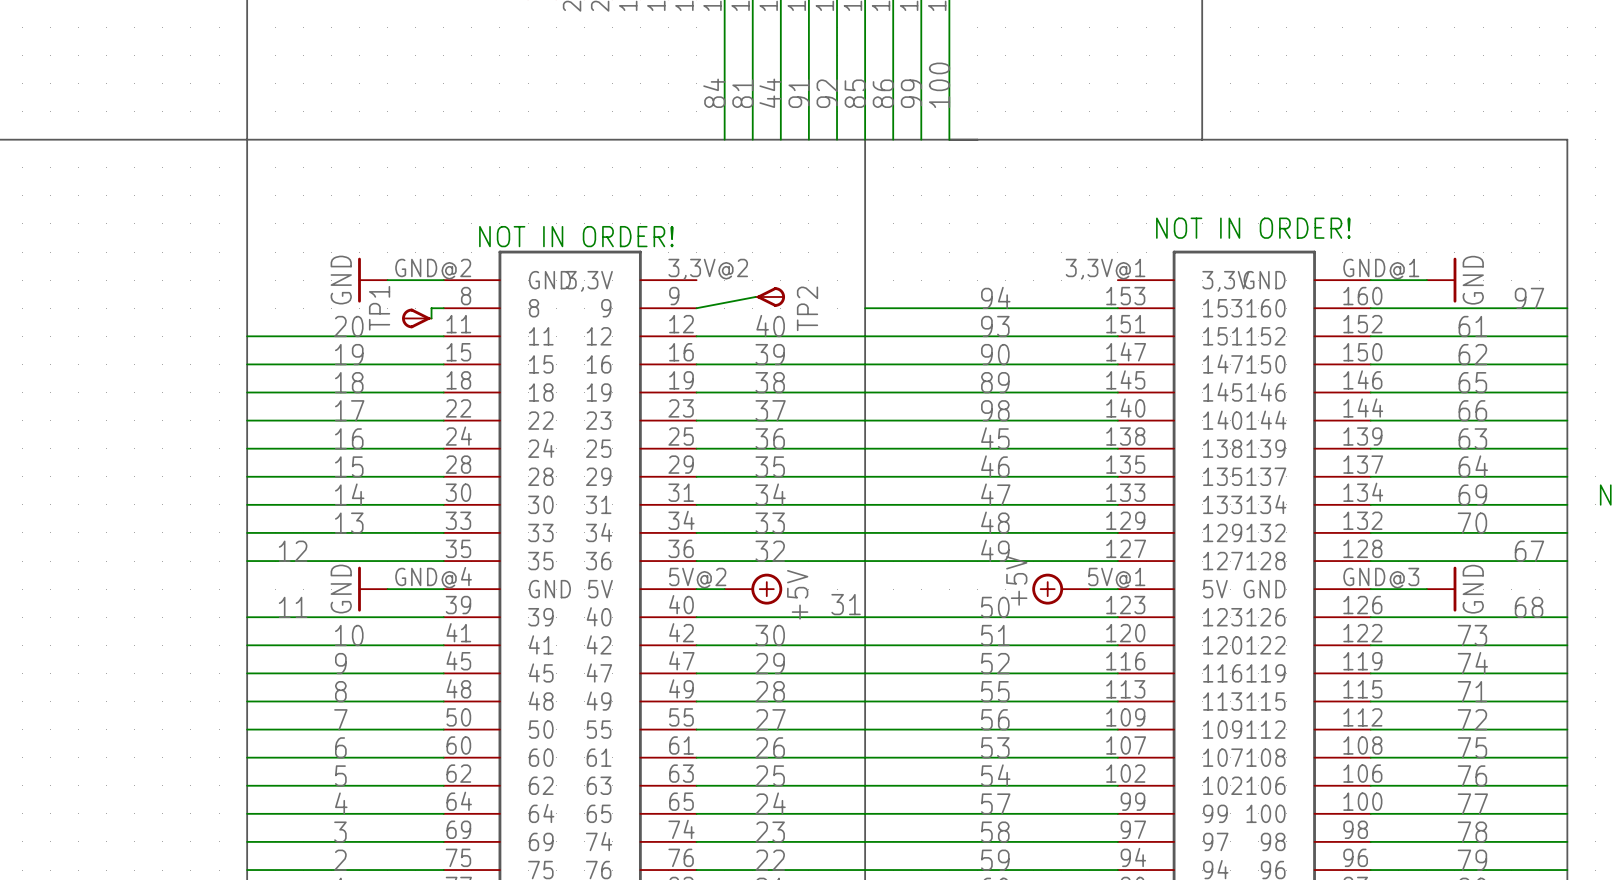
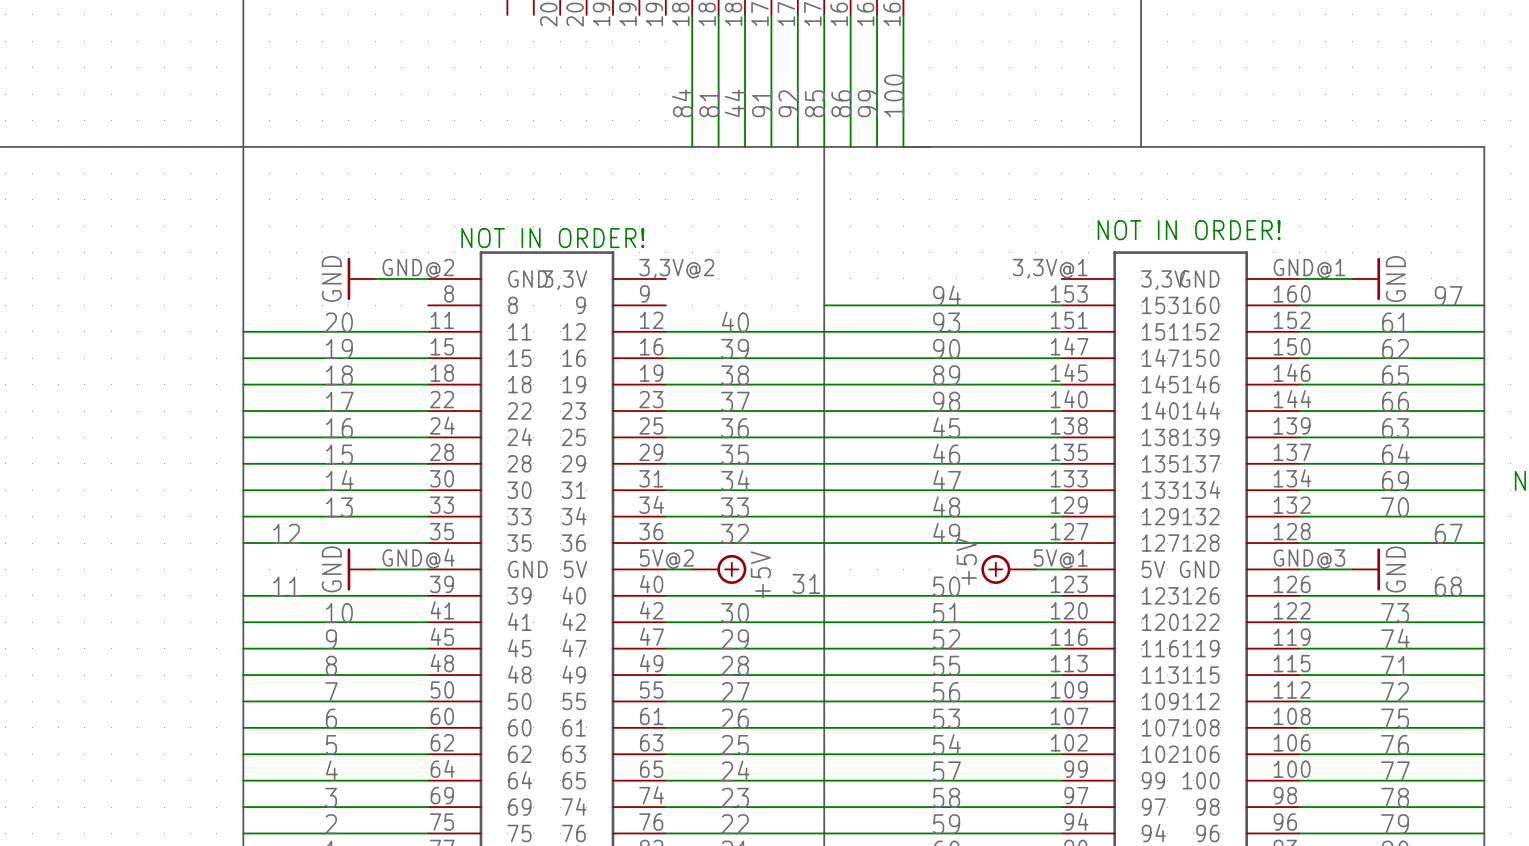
wire: (755, 296) (696, 308) -> none
TP2: (770, 296) -> none
wire: (443, 308) (431, 308) (431, 318) -> none
TP1: (416, 318) -> none

